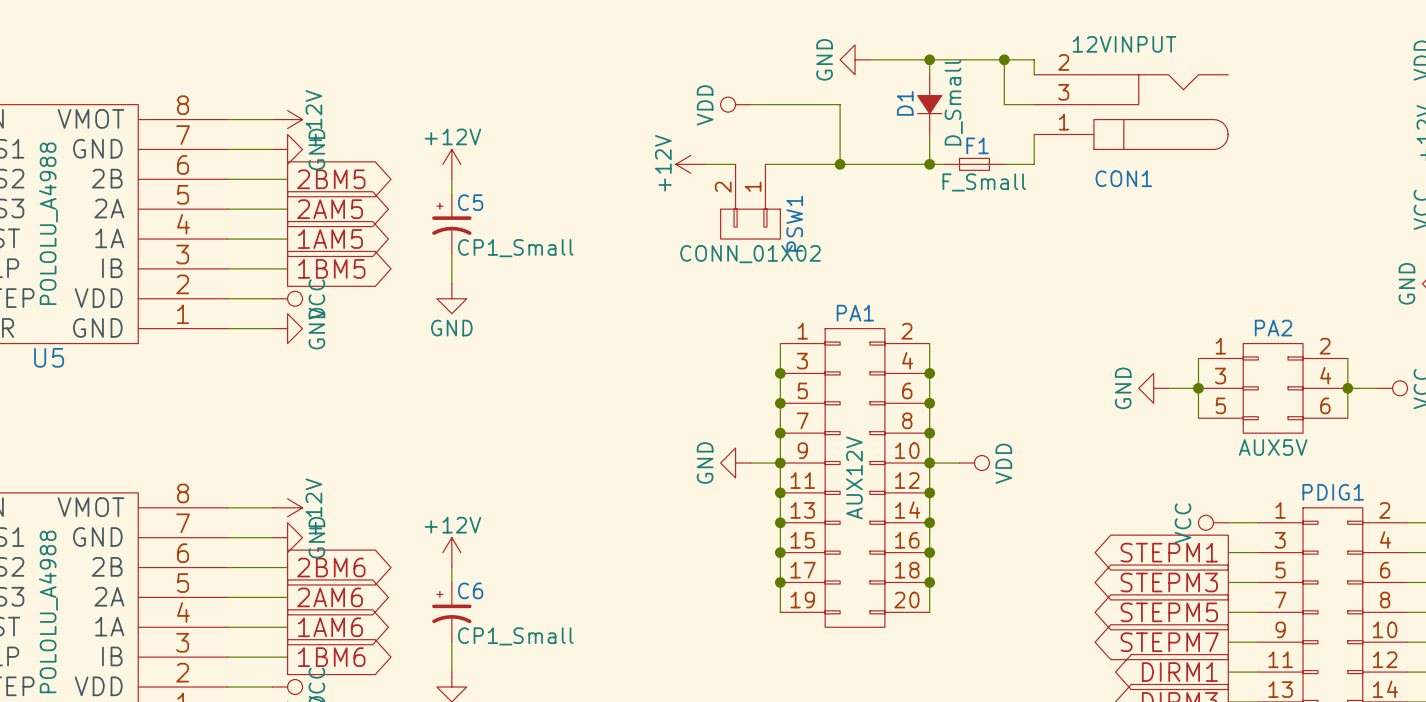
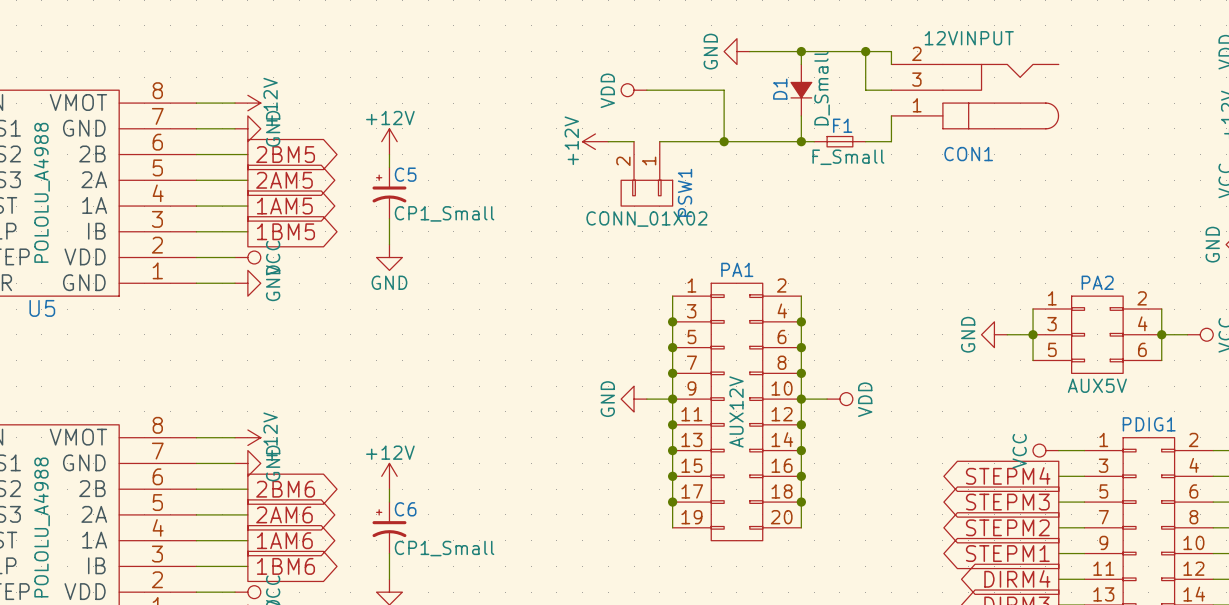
global label: STEPM1 (1169, 552) -> STEPM4 (1008, 475)
global label: STEPM5 (1169, 612) -> STEPM2 (1007, 527)
global label: STEPM7 (1169, 642) -> STEPM1 (1007, 553)
global label: DIRM1 (1179, 672) -> DIRM4 (1017, 578)

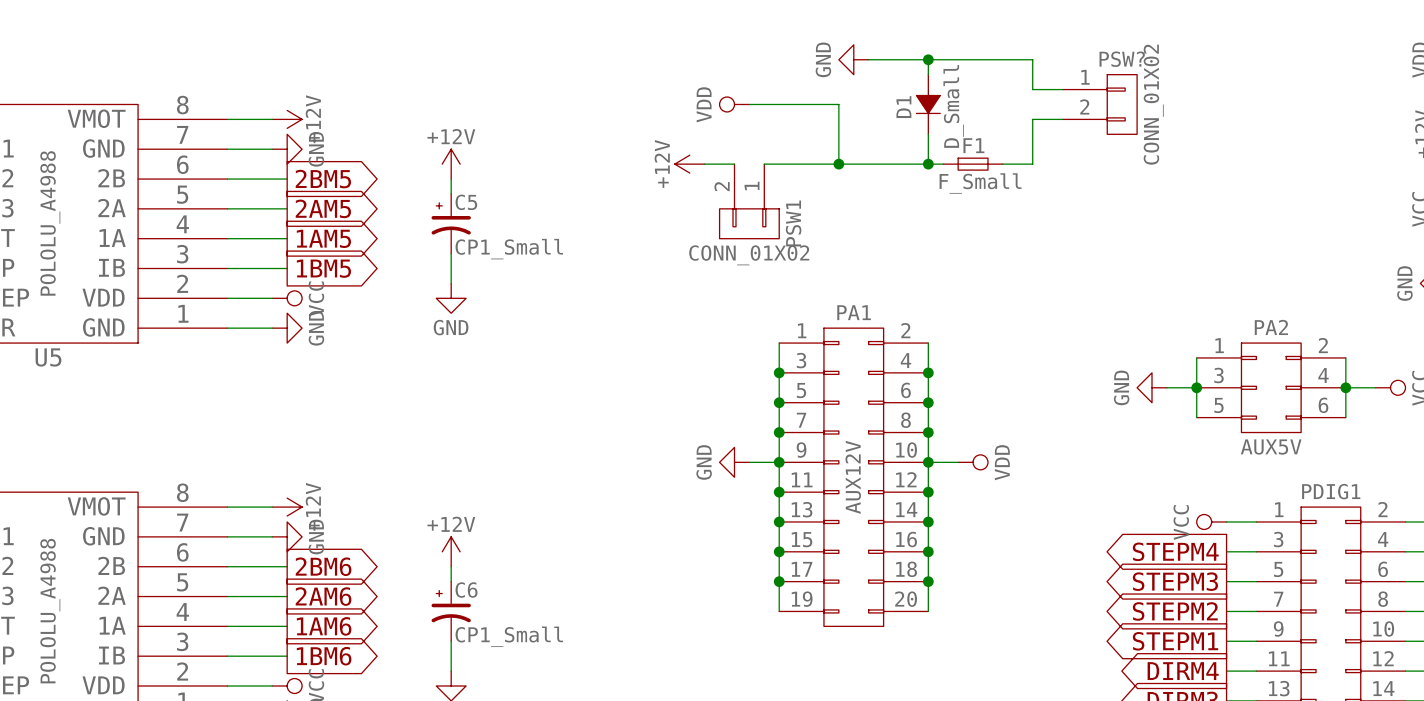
wire: (865, 51) (865, 90) (891, 90) -> none
junction: (865, 51) -> none
wire: none -> (1032, 74) (1032, 89) (1062, 89)
PSW?: none -> CONN_01X02 (1099, 104)
CON1: 12VINPUT (975, 96) -> none
wire: none -> (1062, 119) (1032, 119) (1032, 134)

